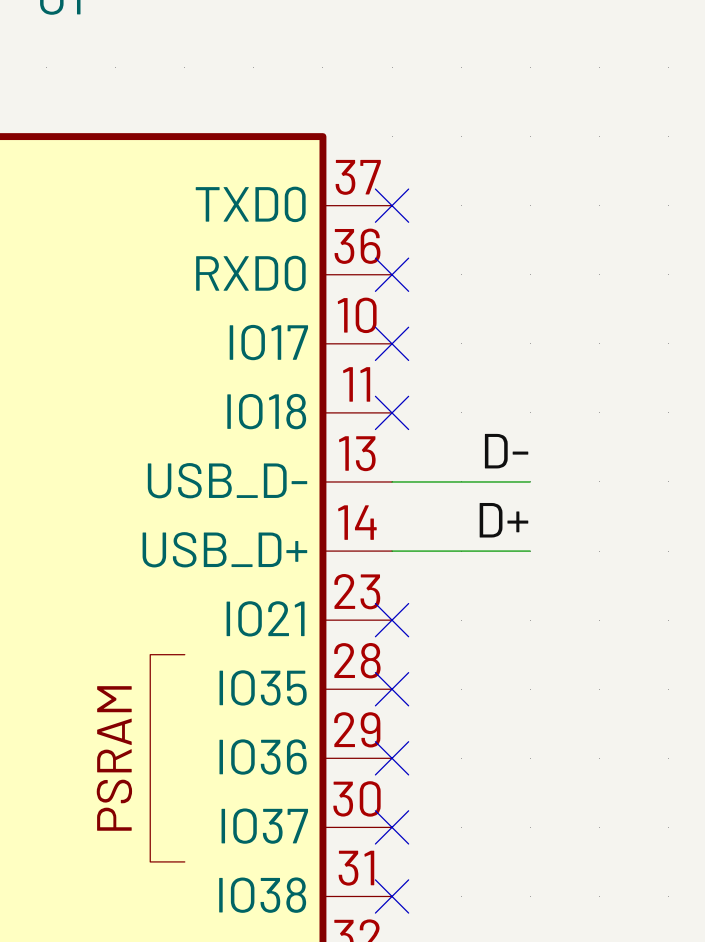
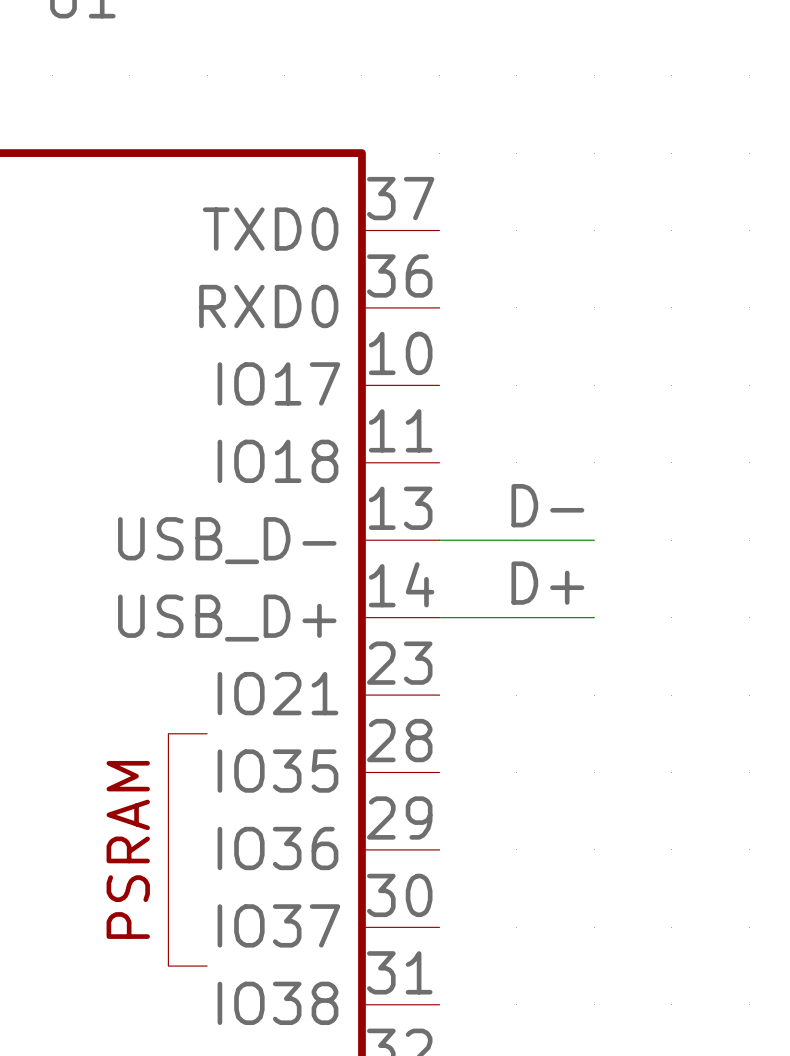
no-connect mark: (392, 205) -> none
no-connect mark: (392, 274) -> none
no-connect mark: (392, 343) -> none
no-connect mark: (392, 412) -> none
no-connect mark: (392, 620) -> none
no-connect mark: (392, 689) -> none
no-connect mark: (392, 758) -> none
no-connect mark: (392, 827) -> none
no-connect mark: (392, 896) -> none

